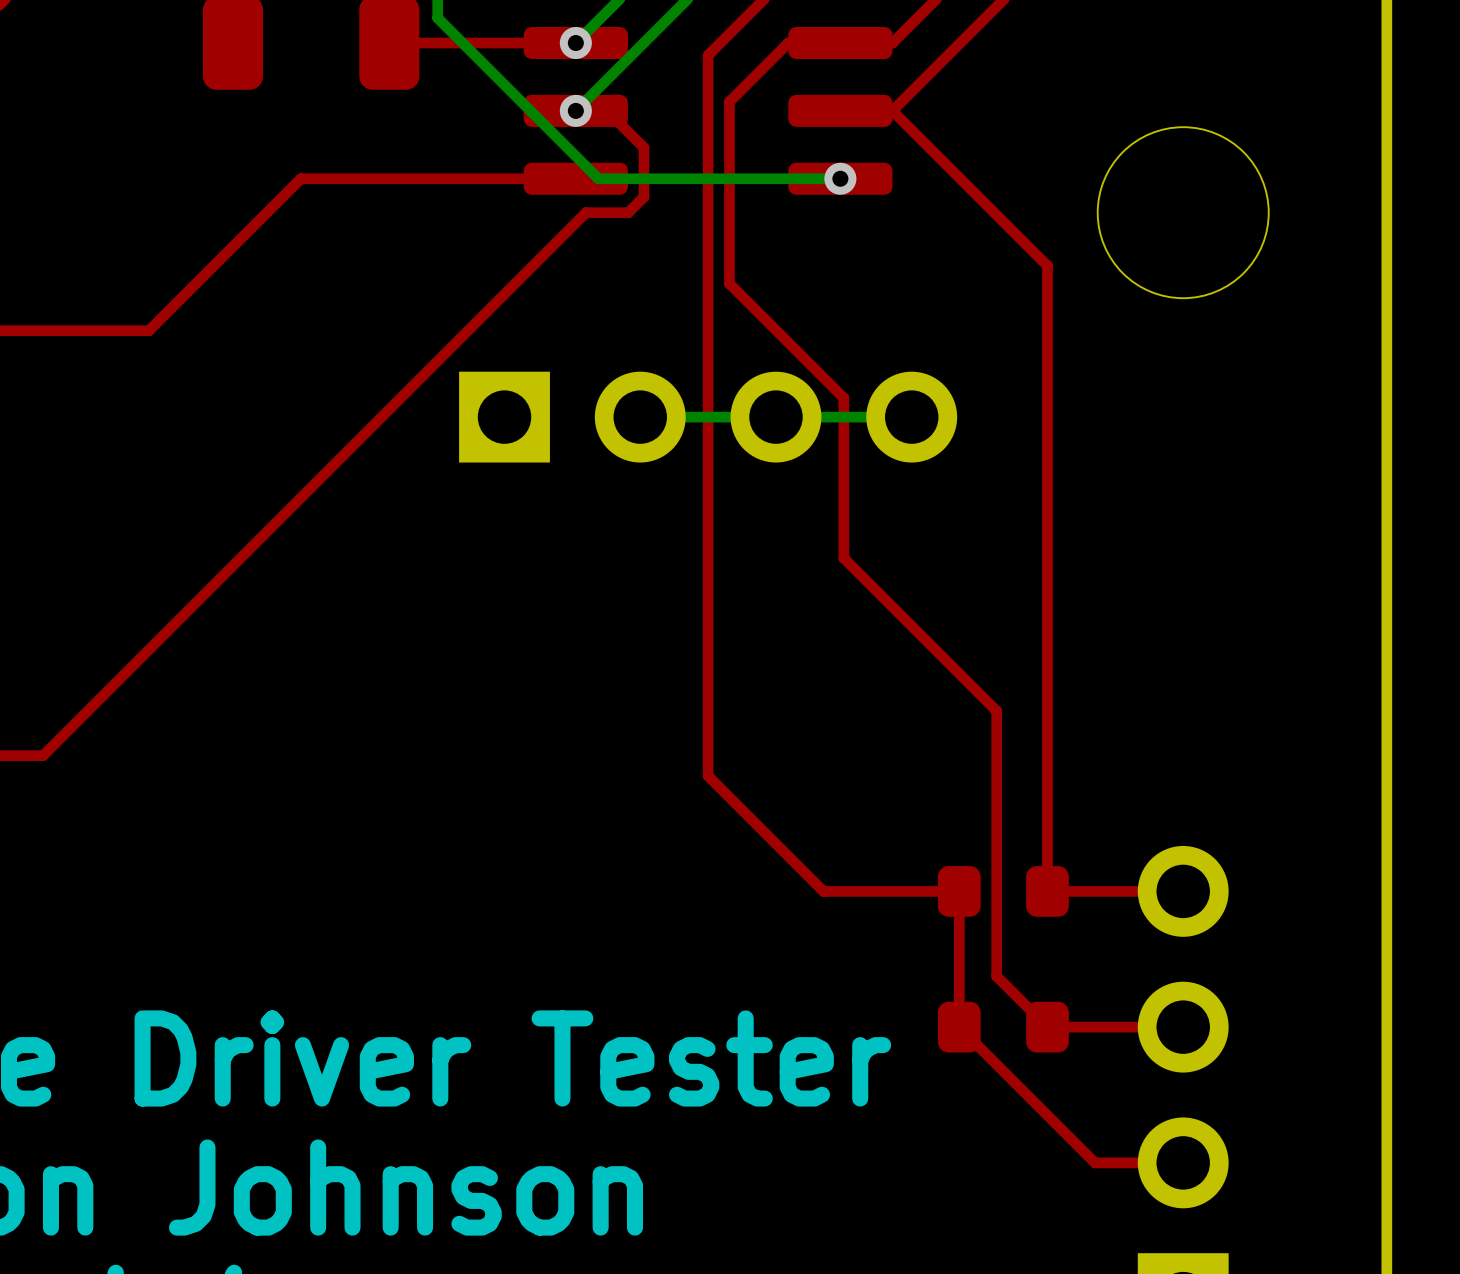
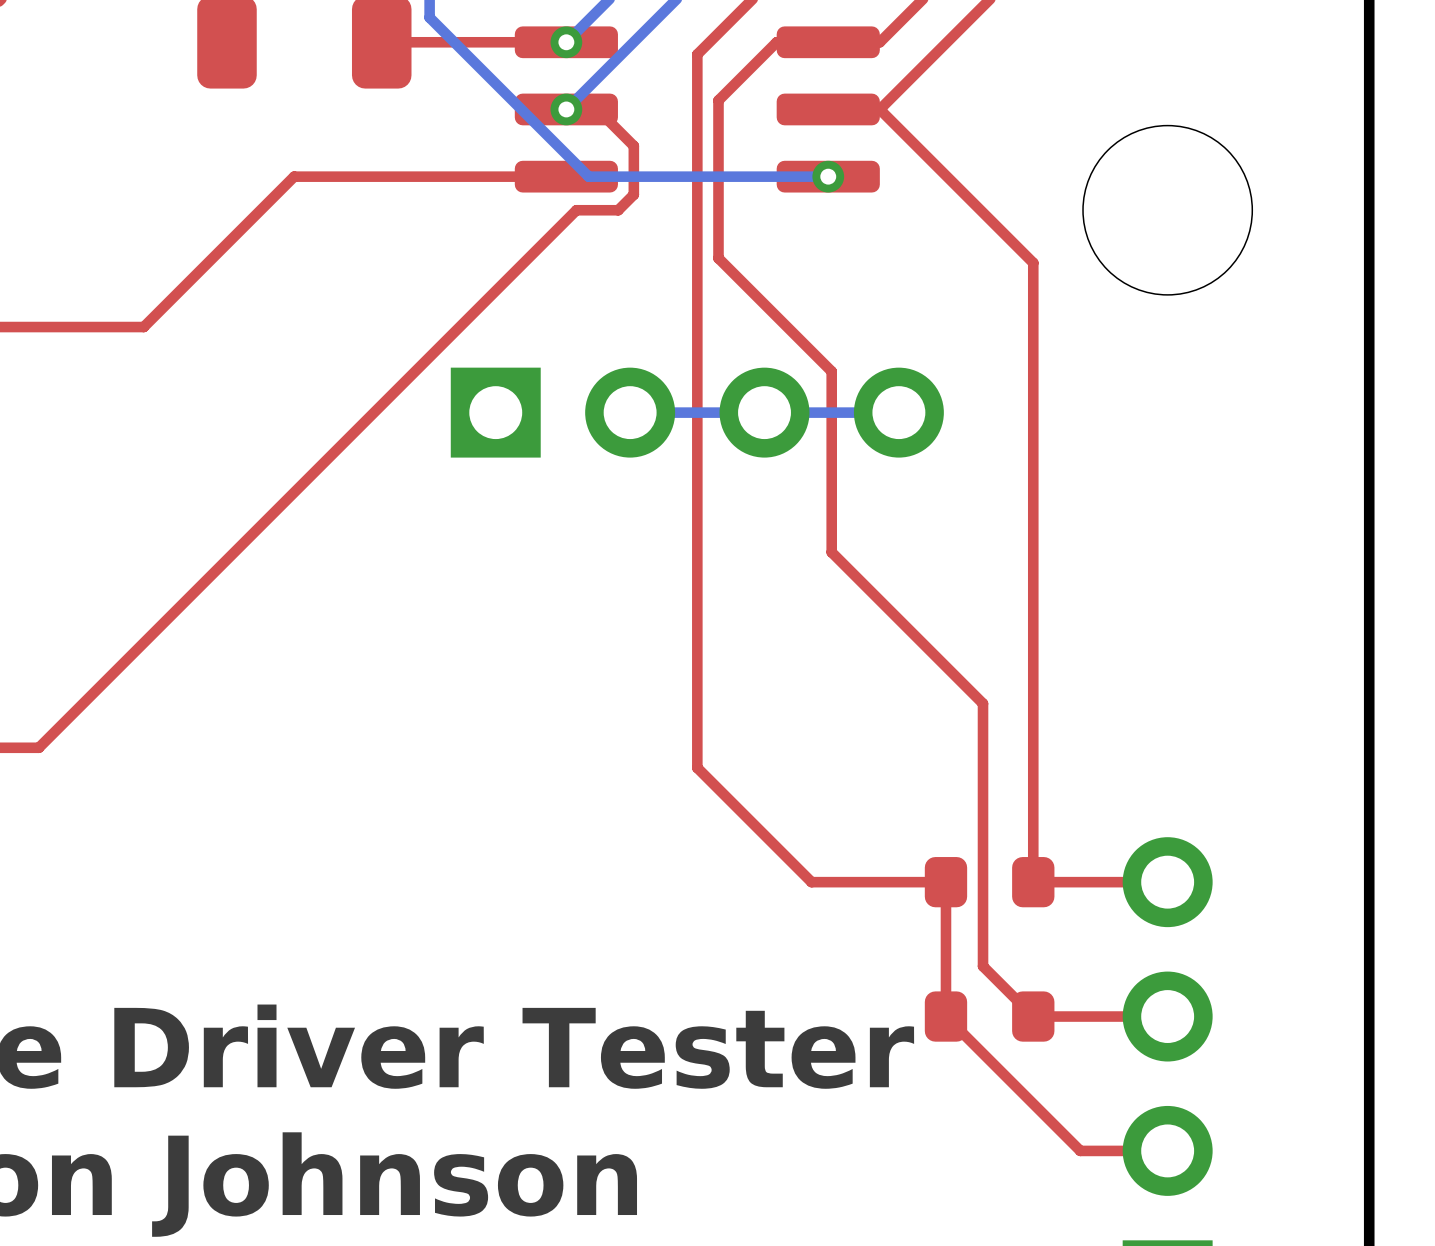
top track: (729, 261) (729, 283) (843, 398) -> (718, 258) (831, 371) (831, 393)

